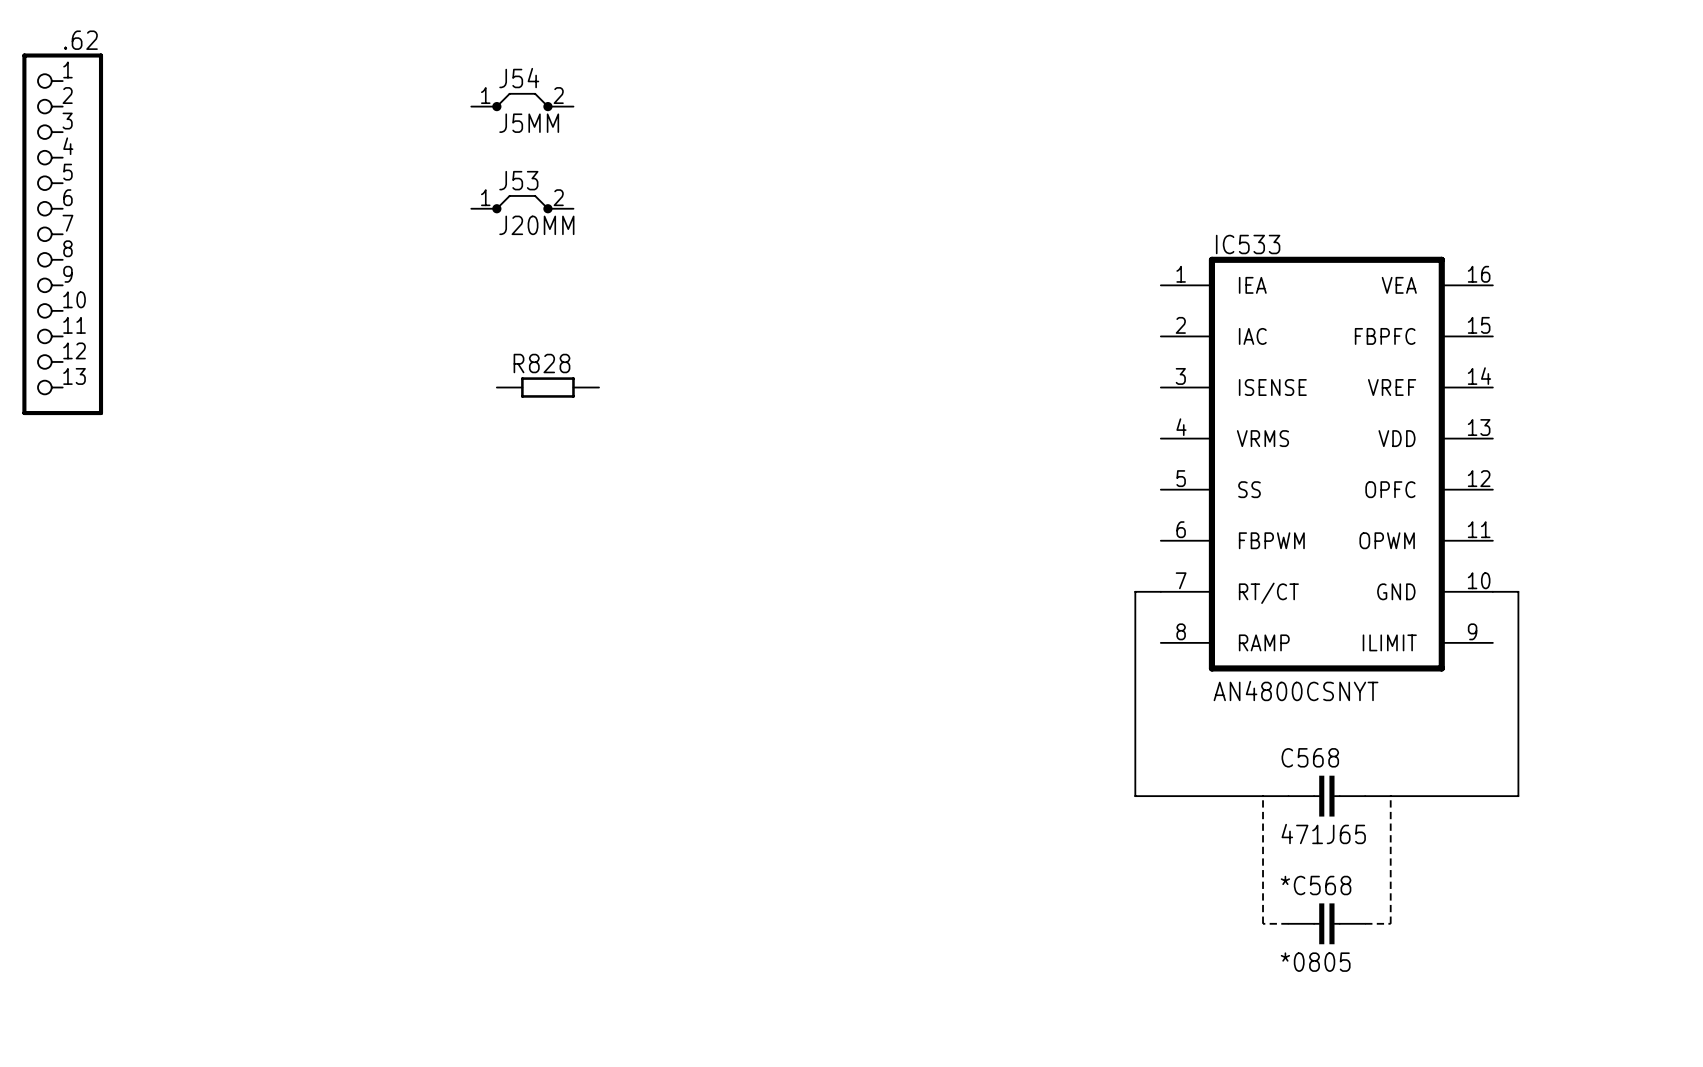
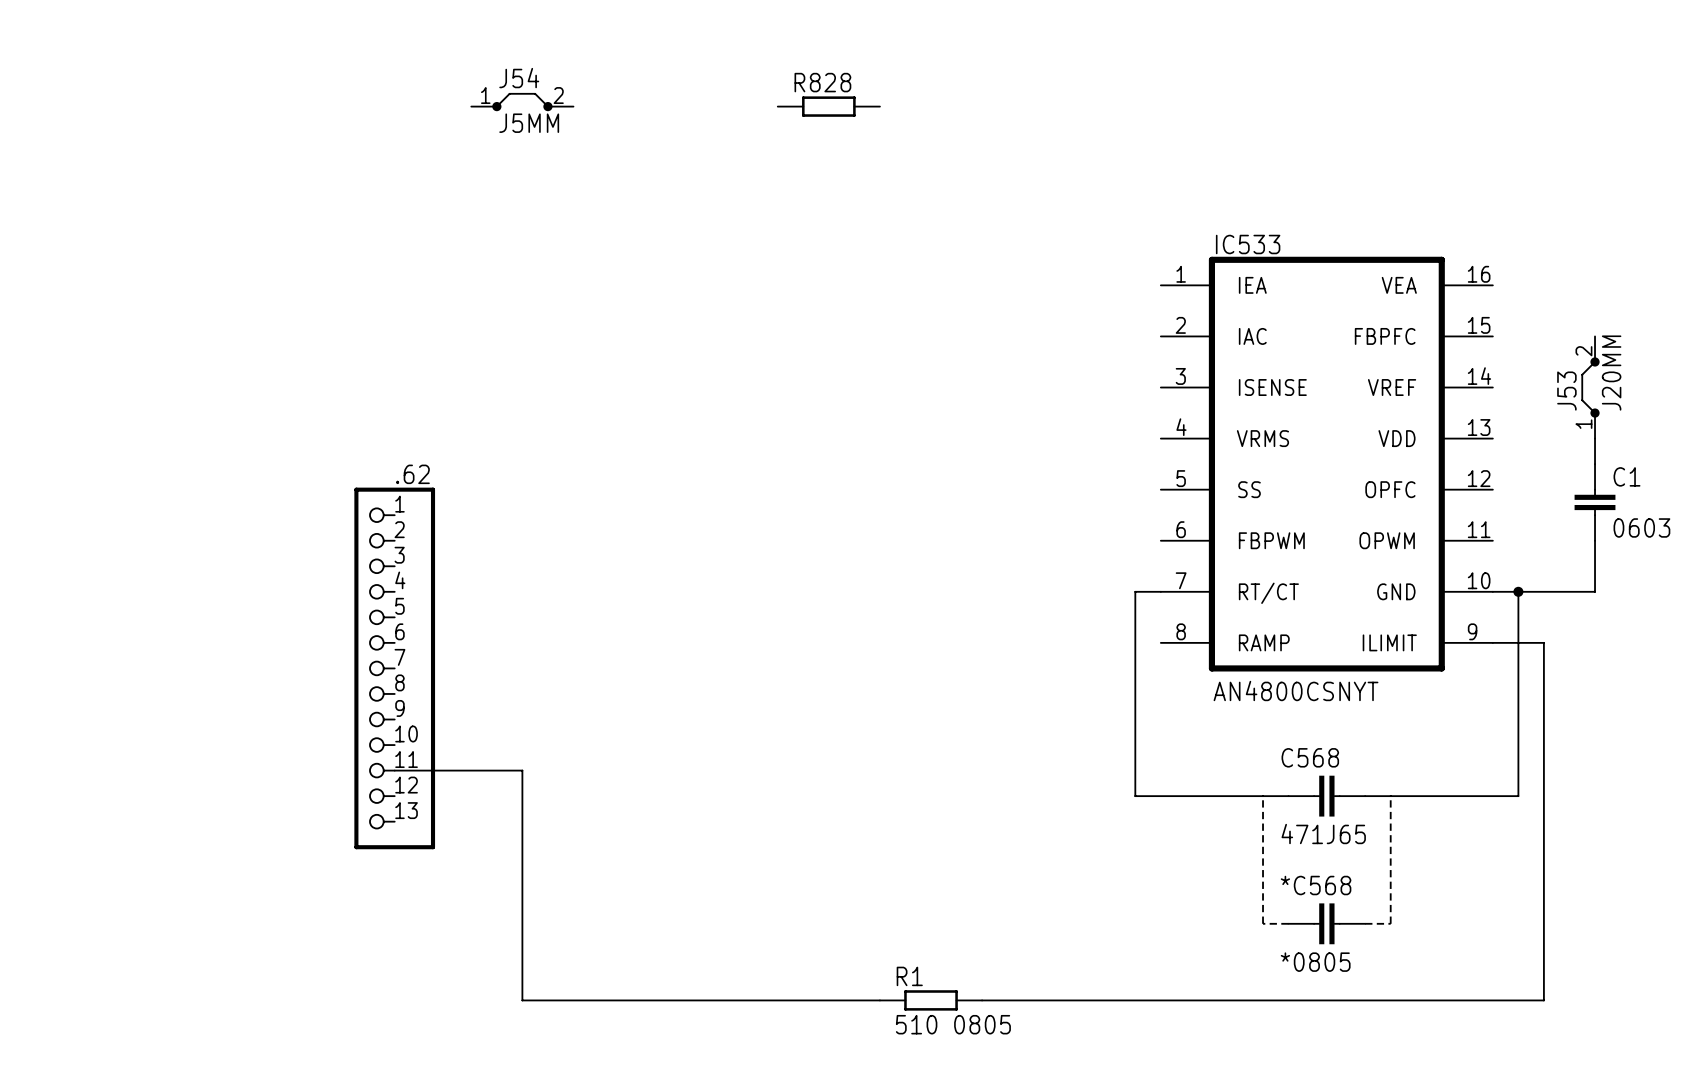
J53 rotation: 0° (522, 204) -> 90° counterclockwise (1590, 387)
J53 position: (522, 204) -> (1590, 387)
.62 position: (62, 234) -> (394, 668)
R828 position: (547, 387) -> (828, 106)
wire: none -> (1595, 438) (1595, 464)
C1: none -> 0603 (1595, 502)
wire: none -> (1595, 540) (1595, 591) (1518, 591)
junction: none -> (1518, 591)
wire: none -> (1492, 642) (1543, 642) (1543, 1000) (982, 1000)
wire: none -> (394, 770) (522, 770) (522, 1000) (879, 1000)
R1: none -> 510 0805 (931, 1000)

